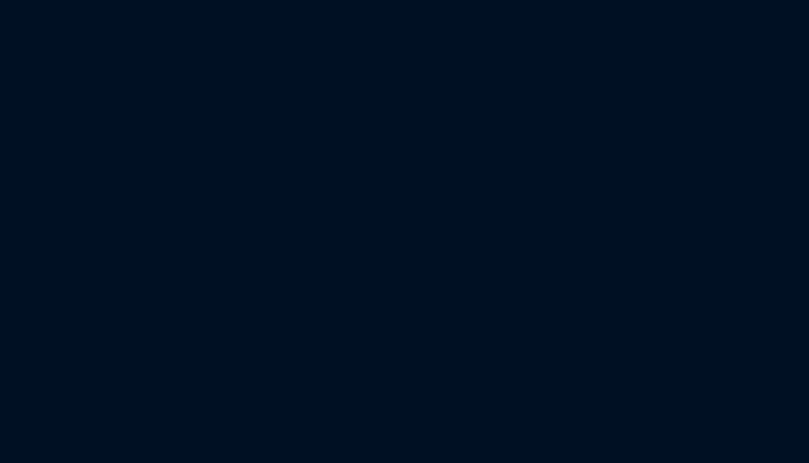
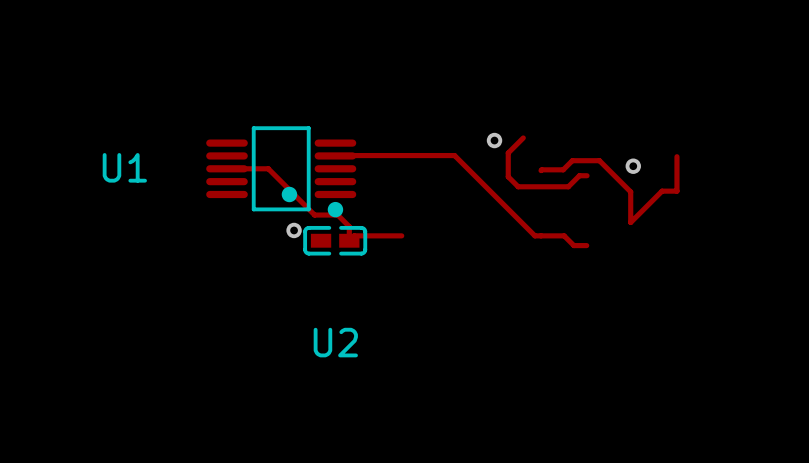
track: none -> (523, 137) (508, 152) (508, 176) (518, 186) (568, 186) (579, 175) (587, 175)
via: none -> (494, 140)
track: none -> (335, 155) (454, 155) (534, 235) (564, 235) (573, 245) (586, 245)
track: none -> (676, 156) (676, 191) (662, 191) (630, 222) (630, 191) (599, 160) (572, 160) (563, 169) (541, 170)
via: none -> (633, 166)
track: none -> (227, 168) (268, 168) (314, 215) (337, 215) (349, 226) (349, 240) (354, 235) (401, 235)
U1: none -> (281, 171)
via: none -> (294, 230)
U2: none -> (335, 240)

